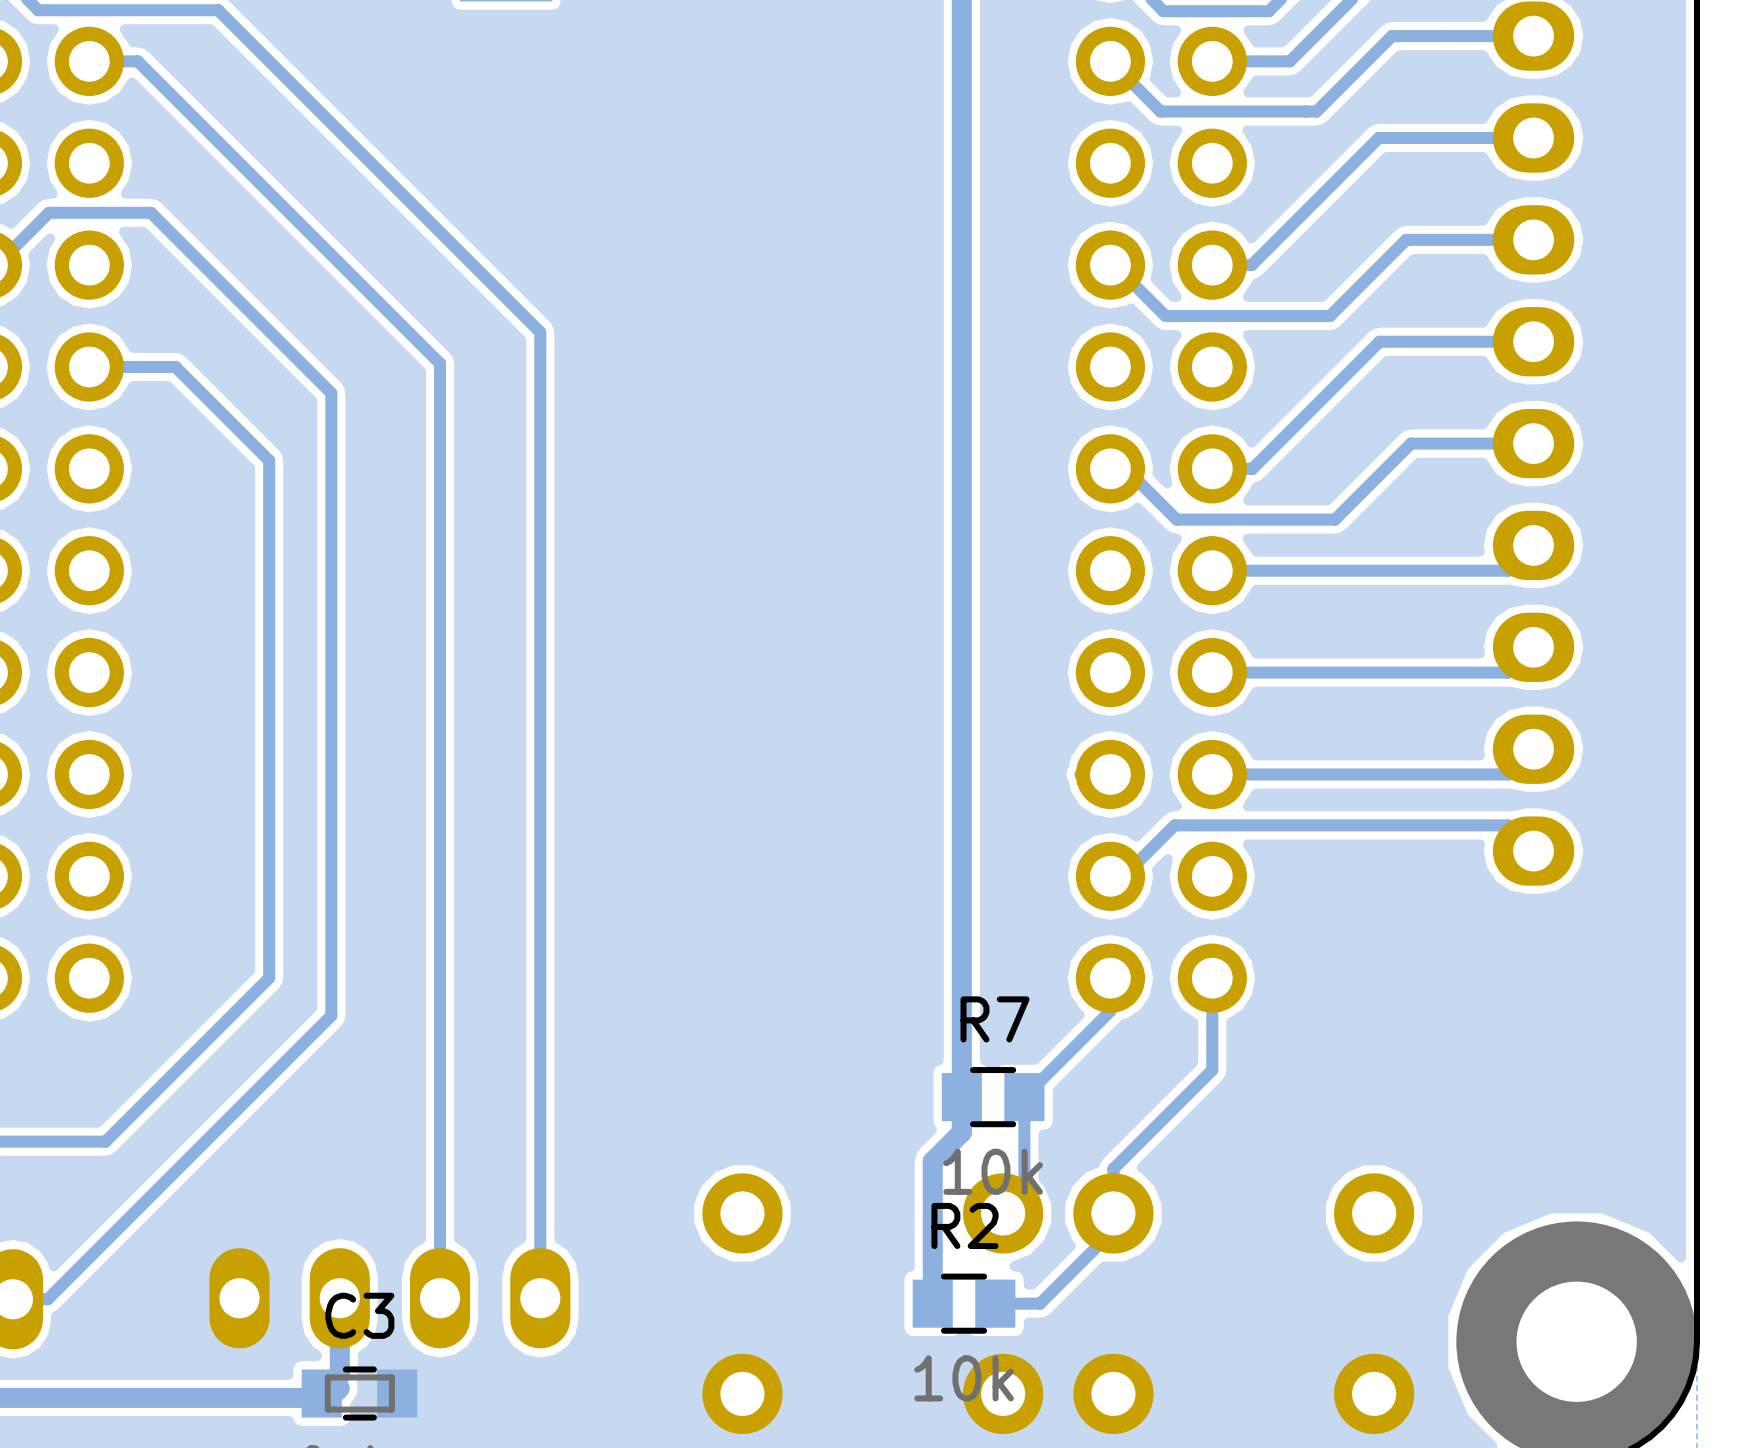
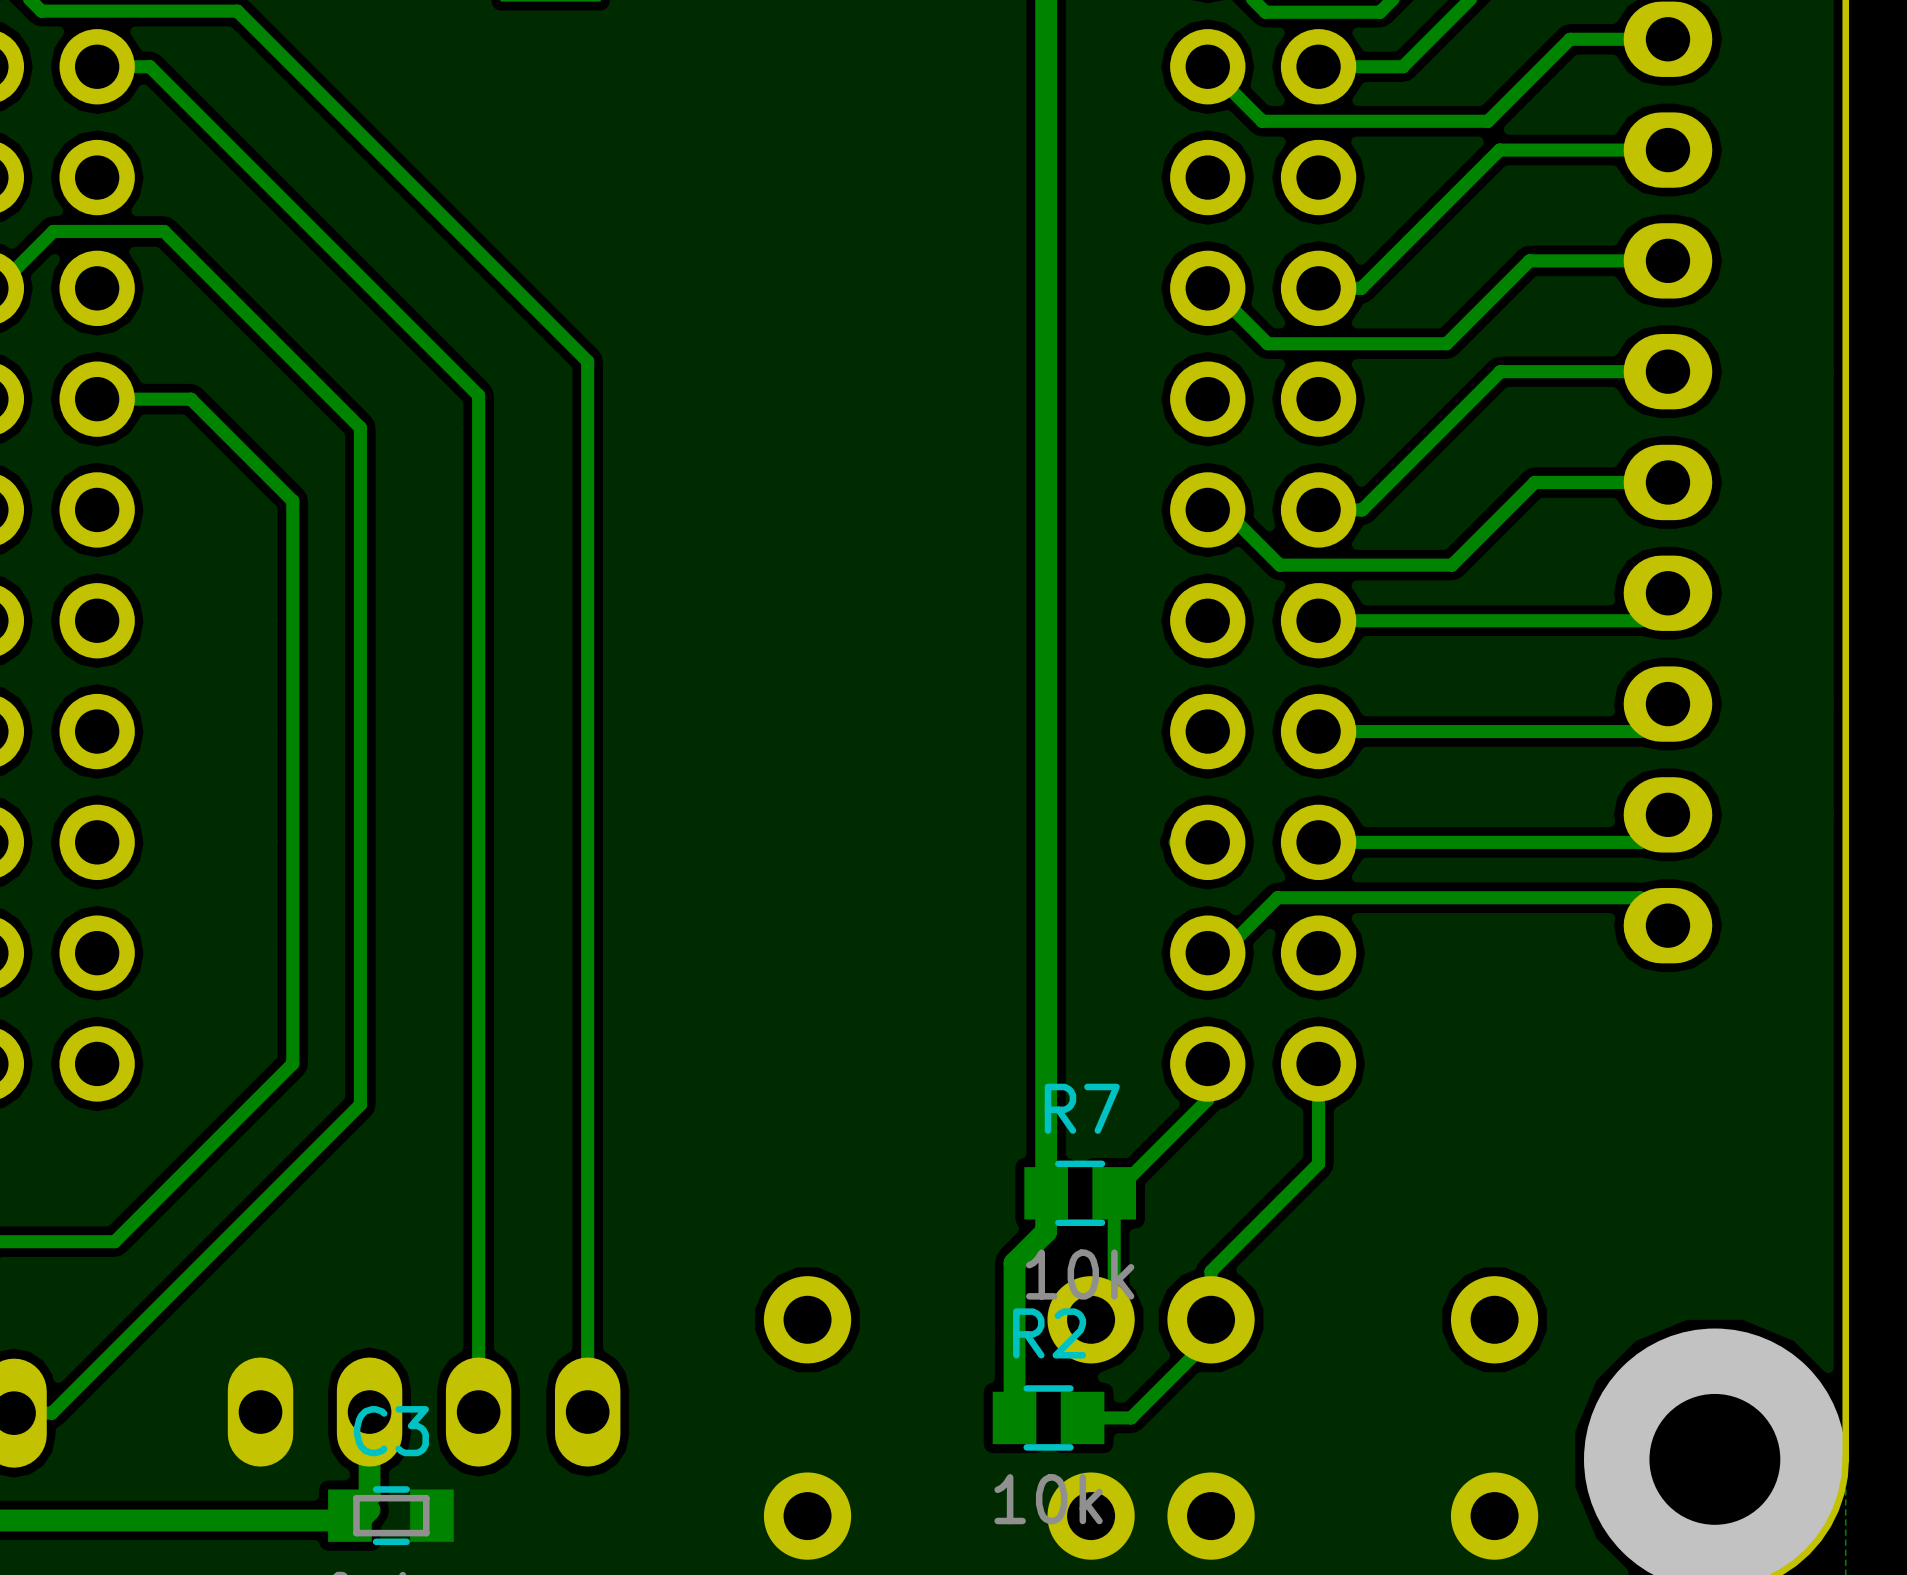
track: (1443, 36) (1391, 36) (1316, 111) -> (1570, 39) (1488, 121) (1431, 121)

